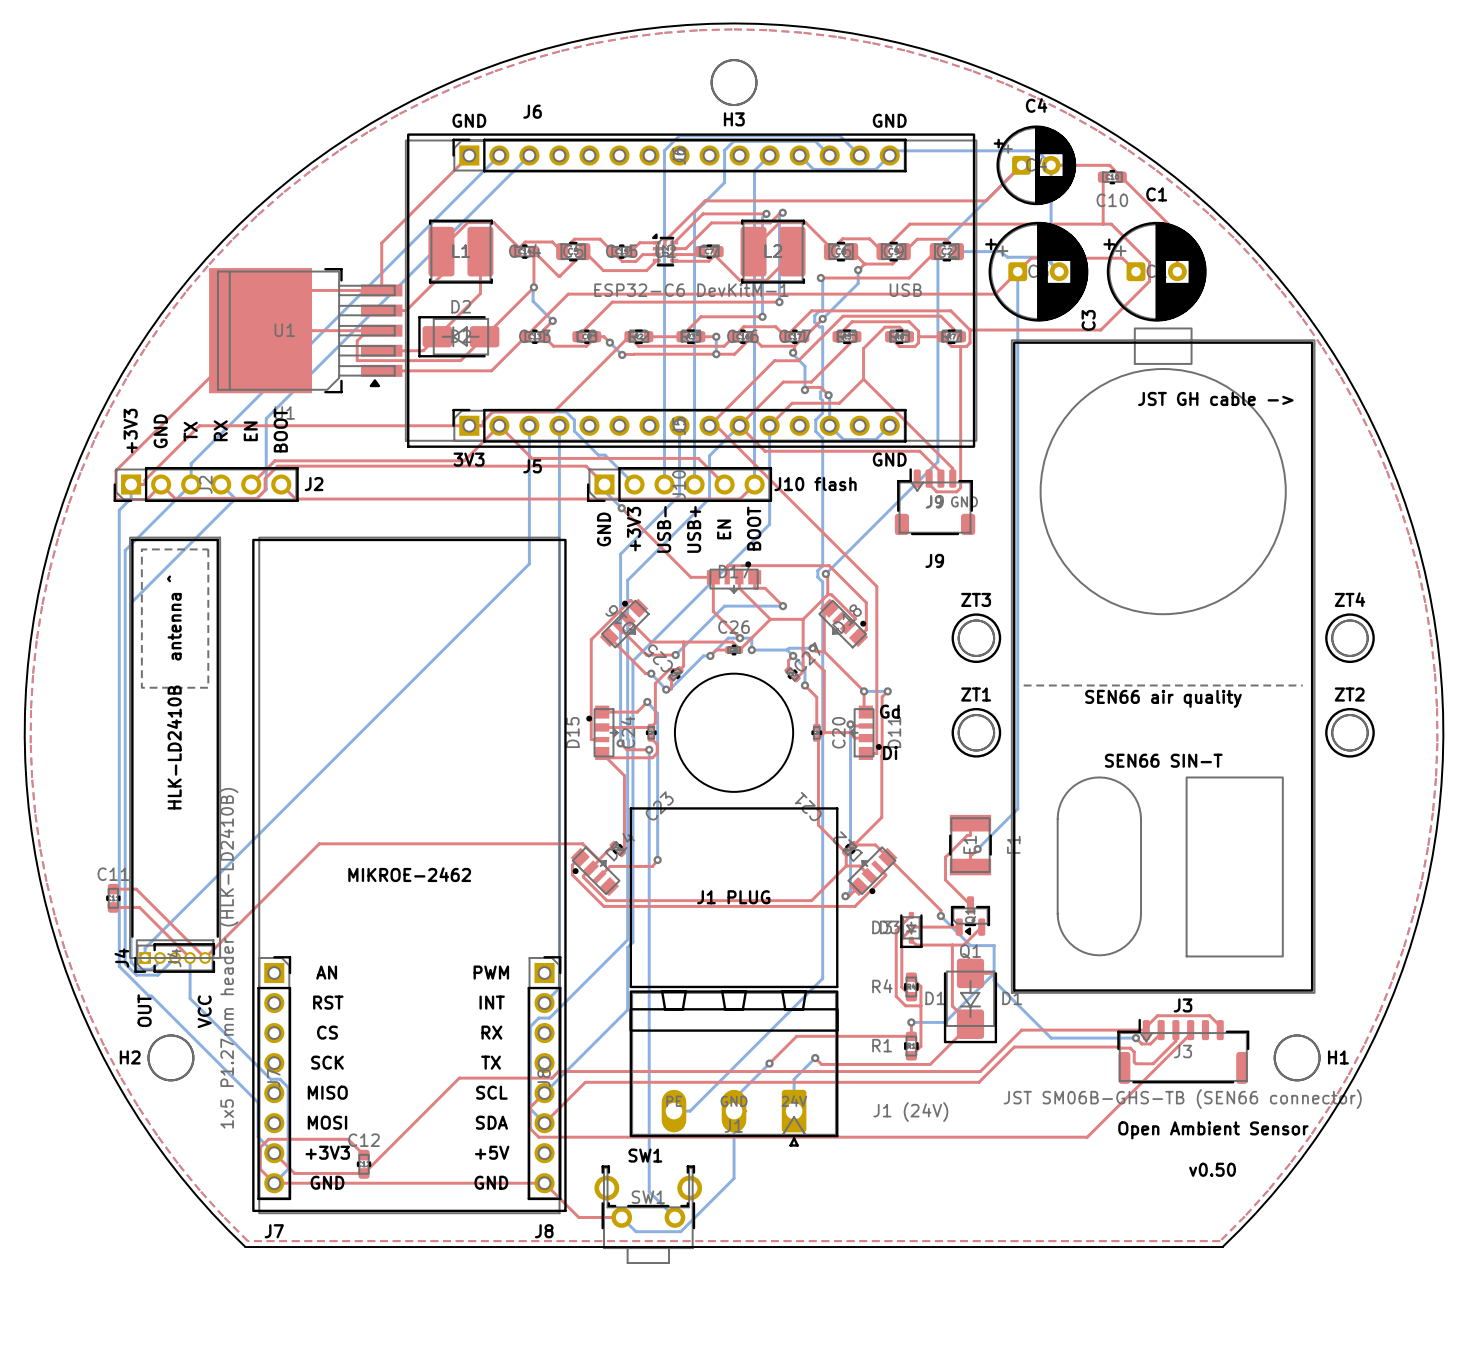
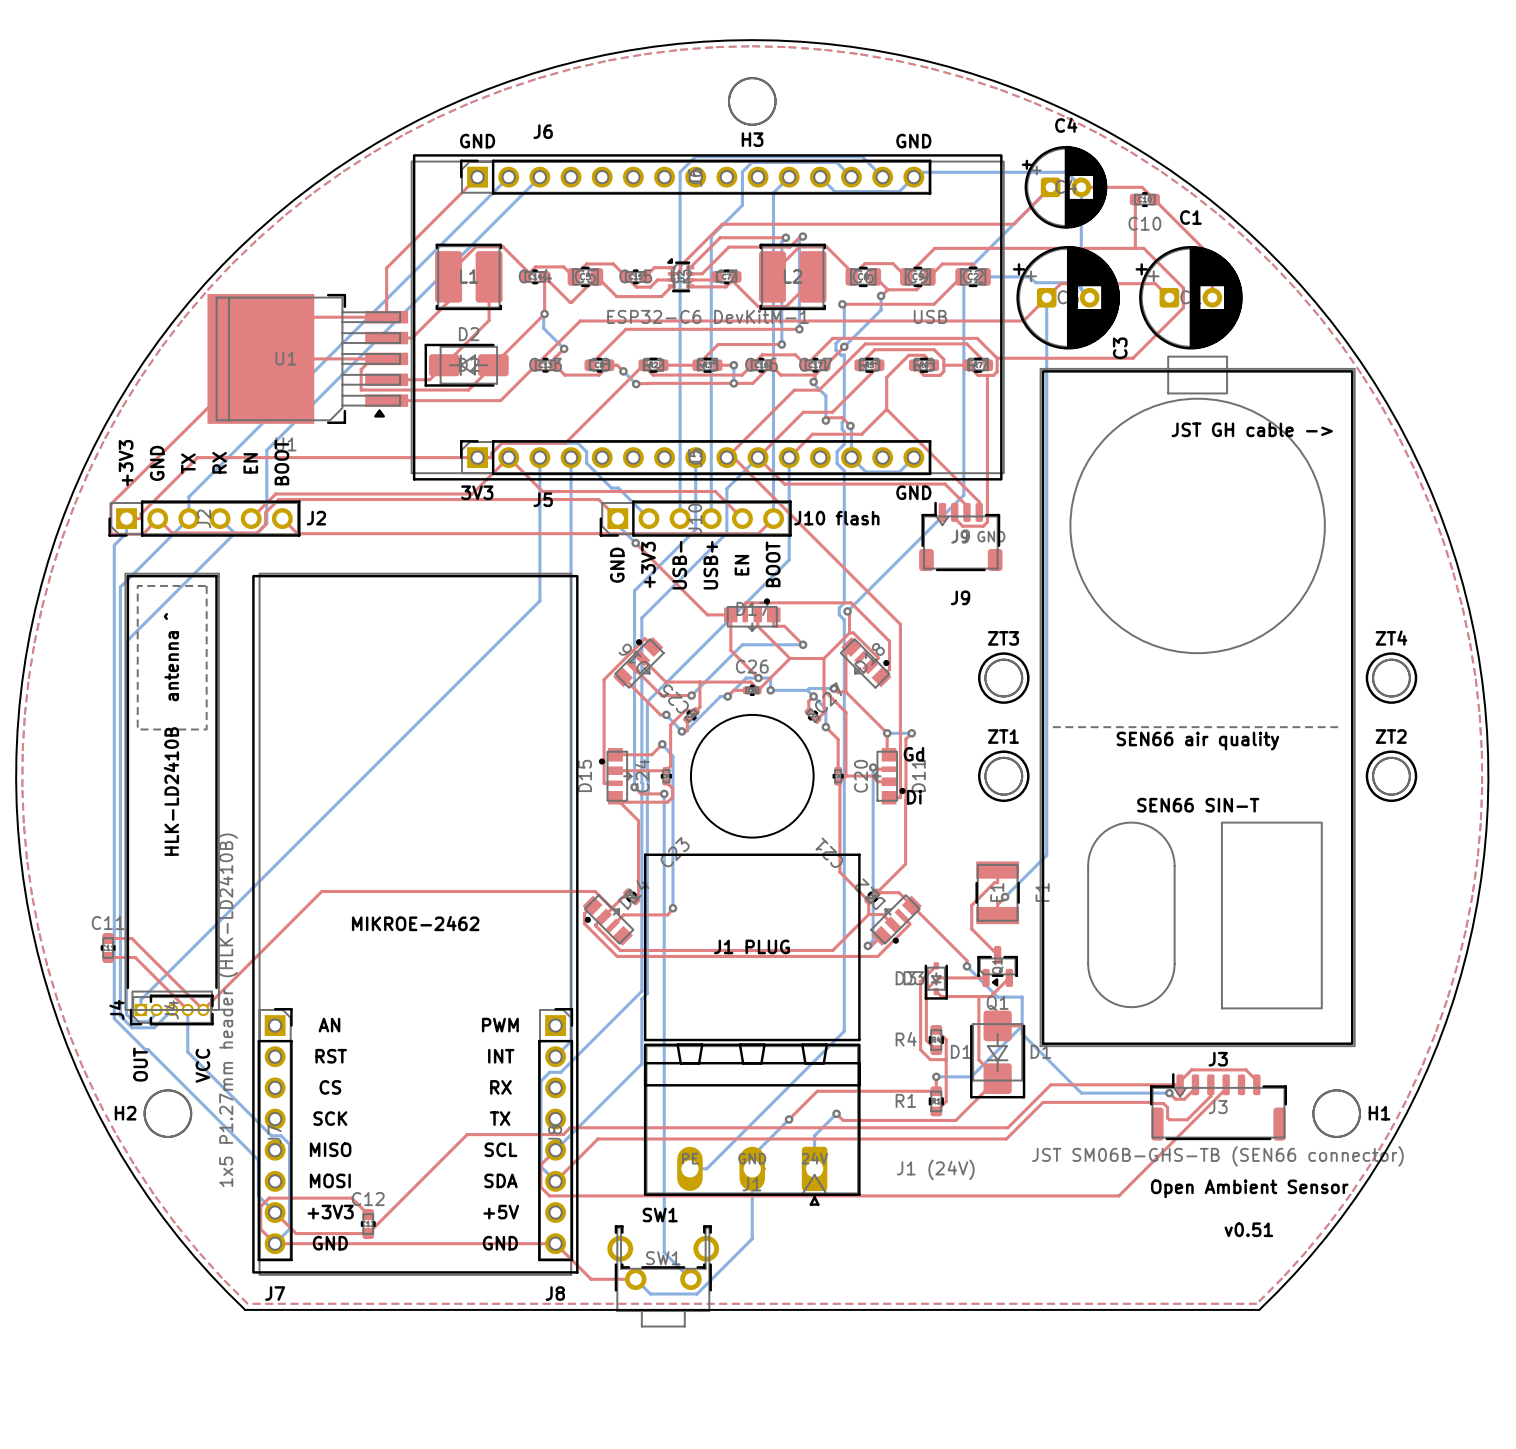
text: v0.50 (1212, 1169) -> v0.51 (1248, 1229)

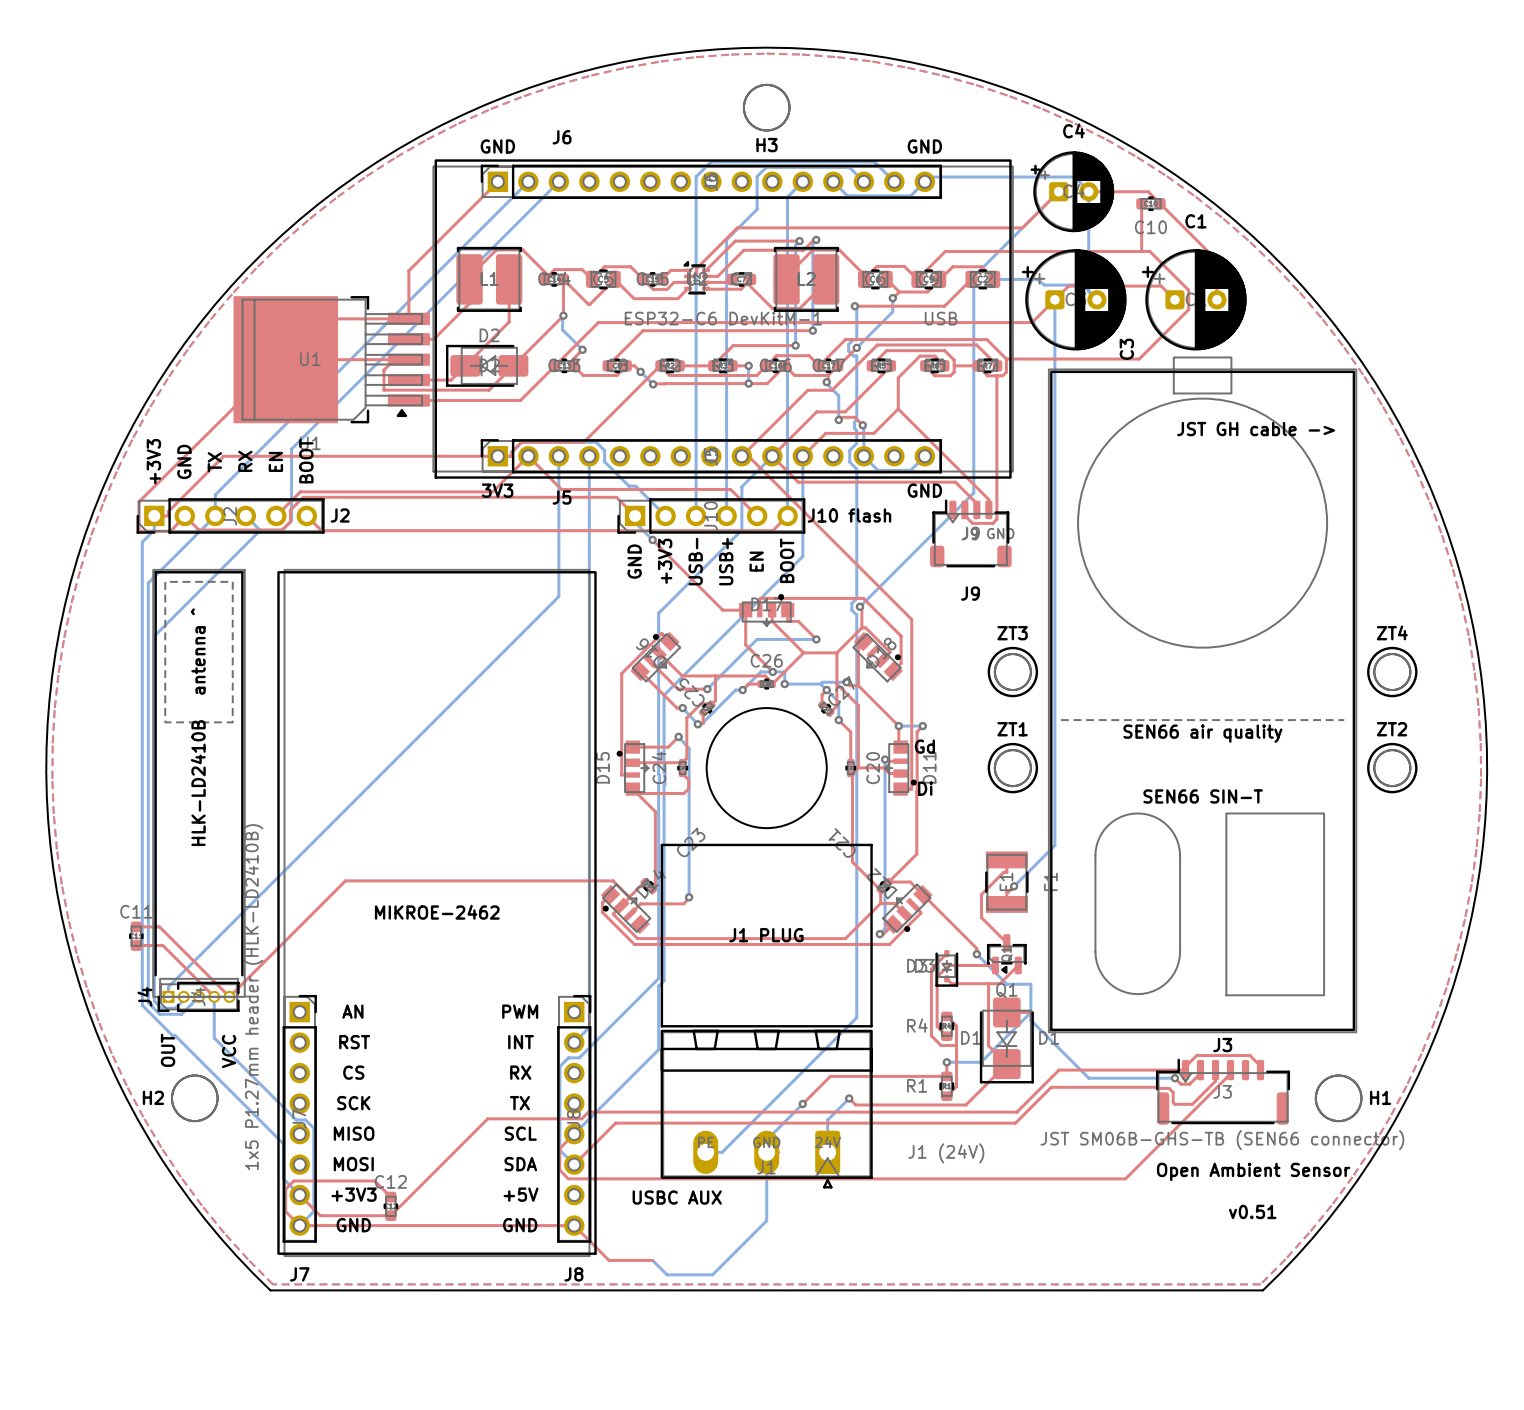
bottom track: (695, 457) (695, 529) (634, 590) (634, 787) -> none
top track: (634, 787) (641, 793) (664, 793) -> none
via: (634, 787) -> none
bottom track: (664, 793) (664, 1252) (690, 1279) -> none
via: (664, 793) -> none
text: SW1 (660, 1215) -> USBC AUX (677, 1197)
part: (663, 1276) -> none

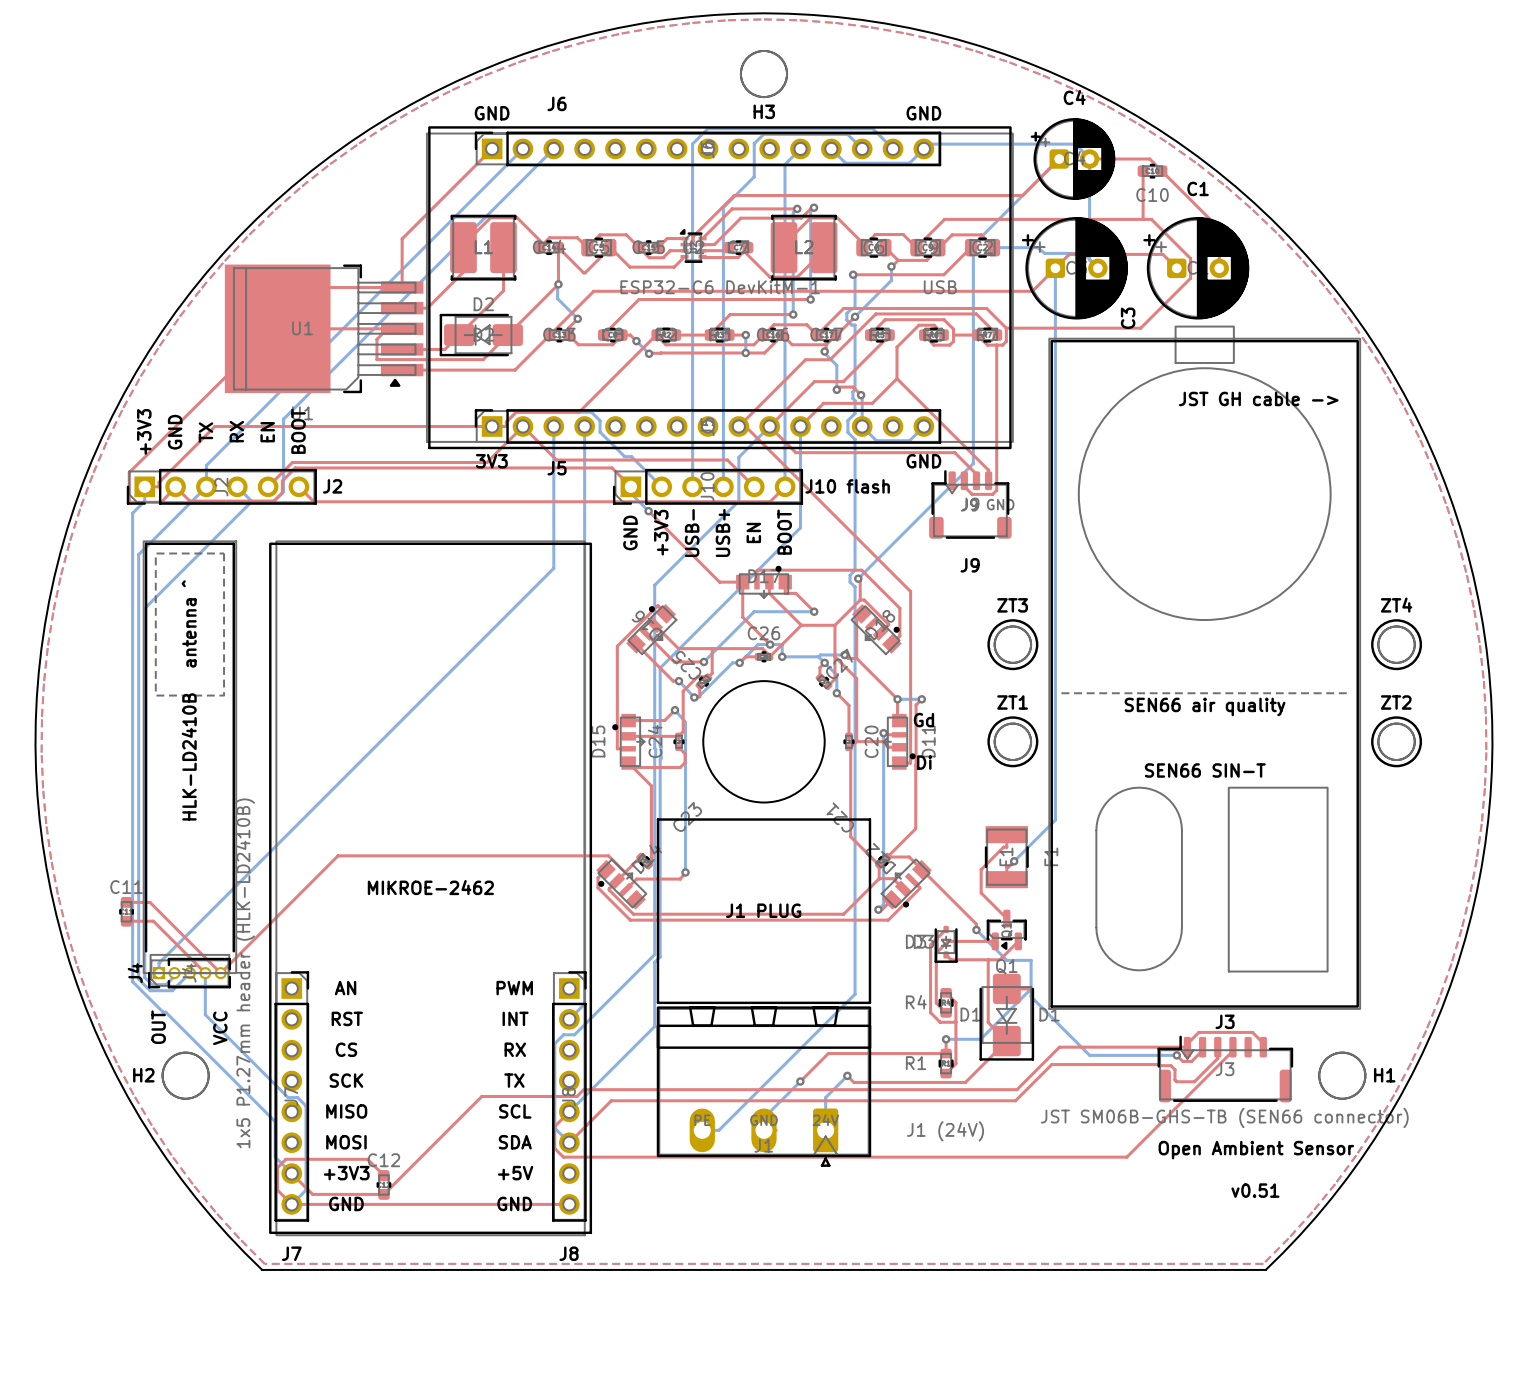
bottom track: (766, 1152) (766, 1220) (712, 1274) (667, 1274) (652, 1260) -> none
text: USBC AUX (677, 1197) -> none
top track: (574, 1225) (609, 1260) (652, 1260) -> none

